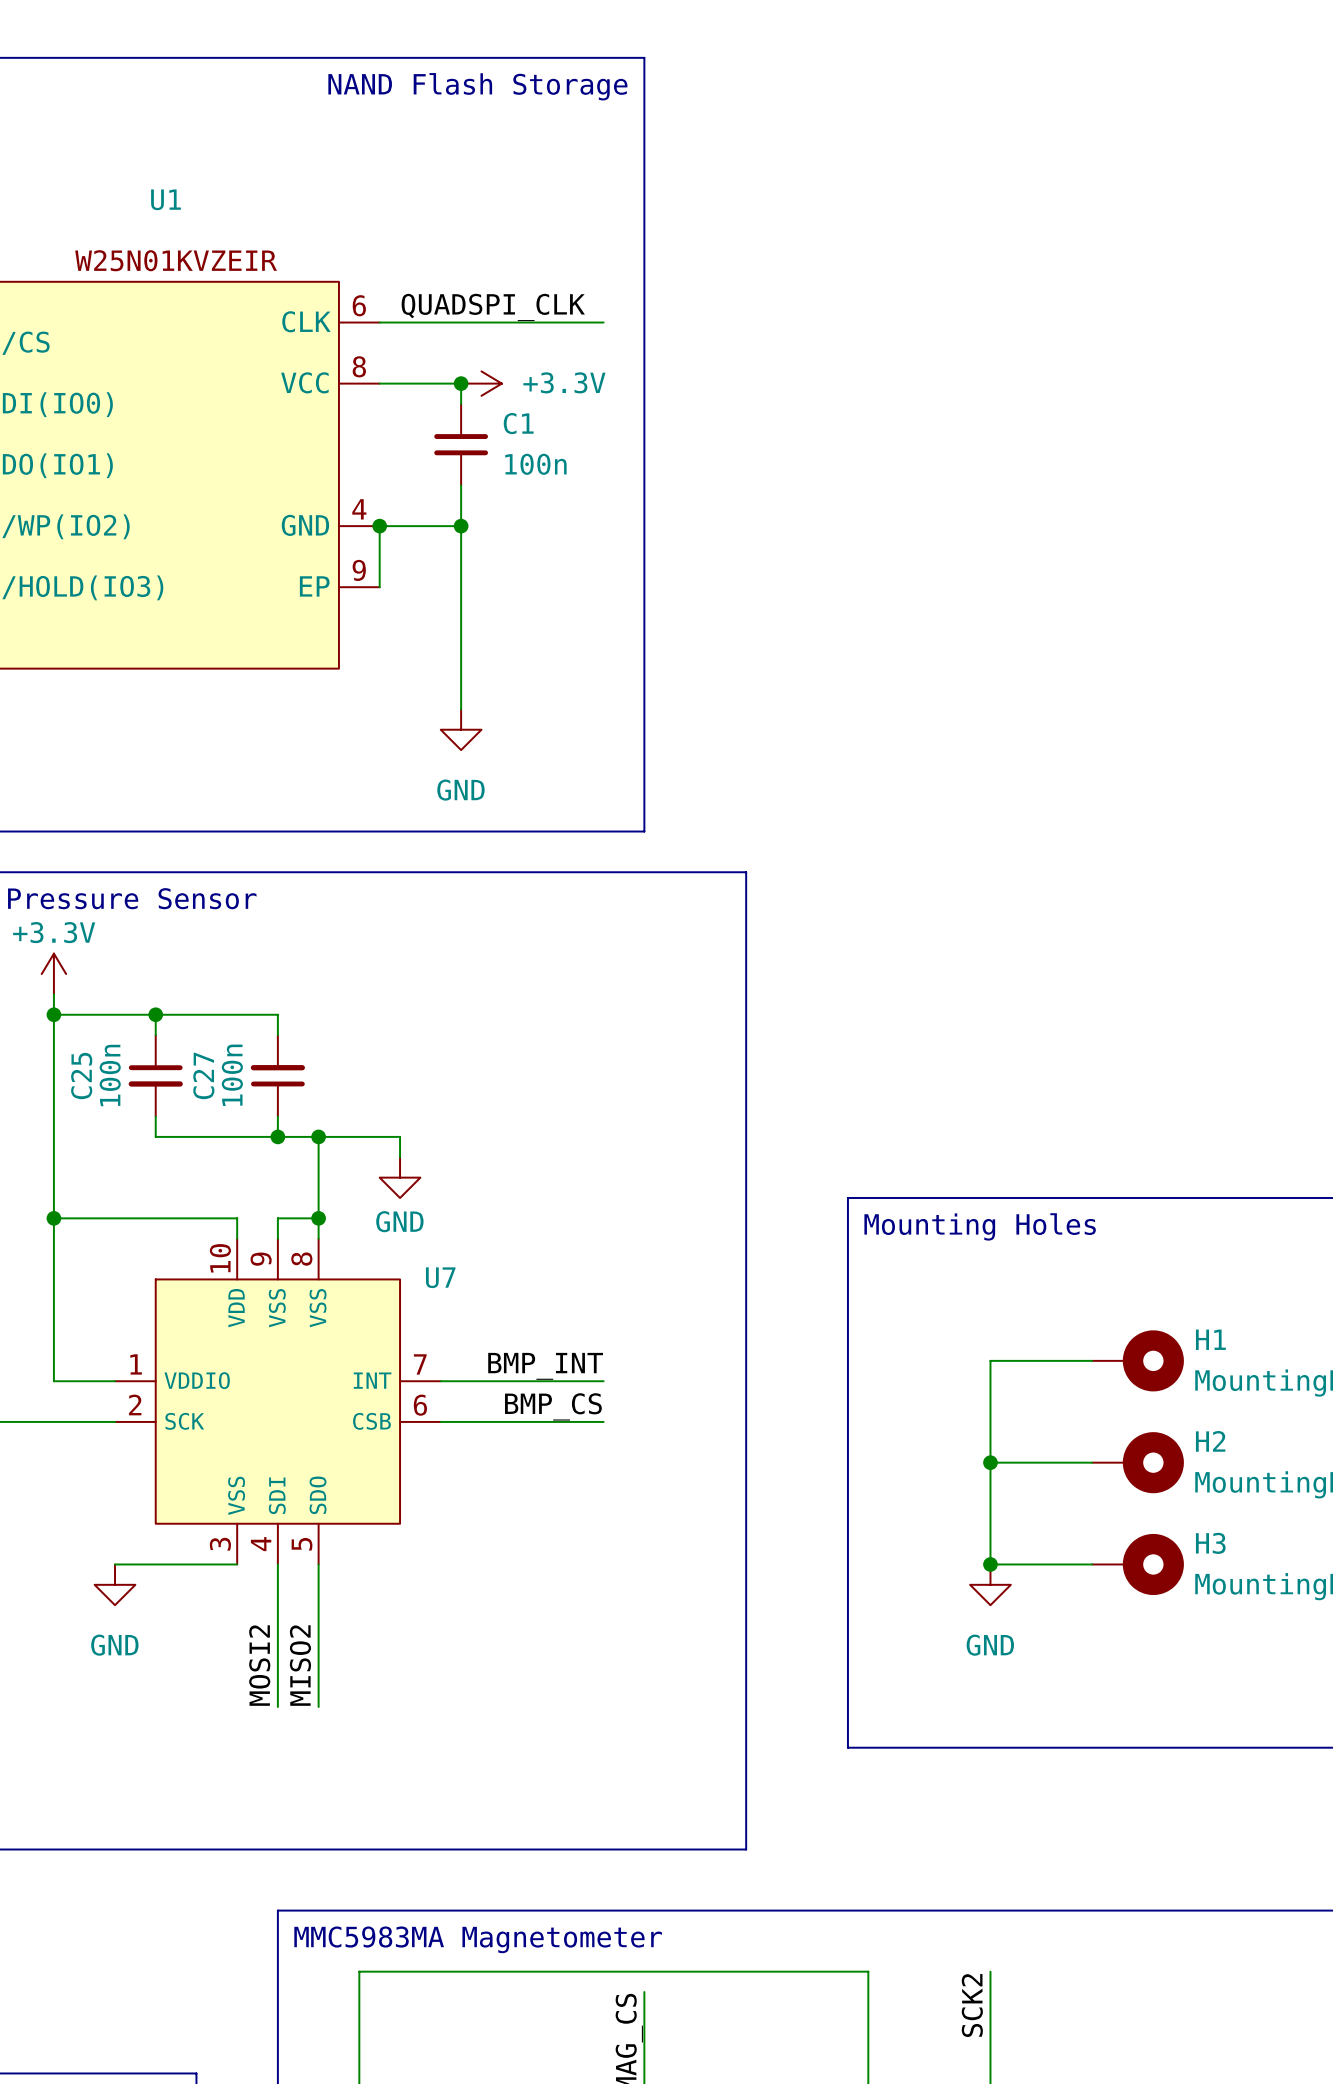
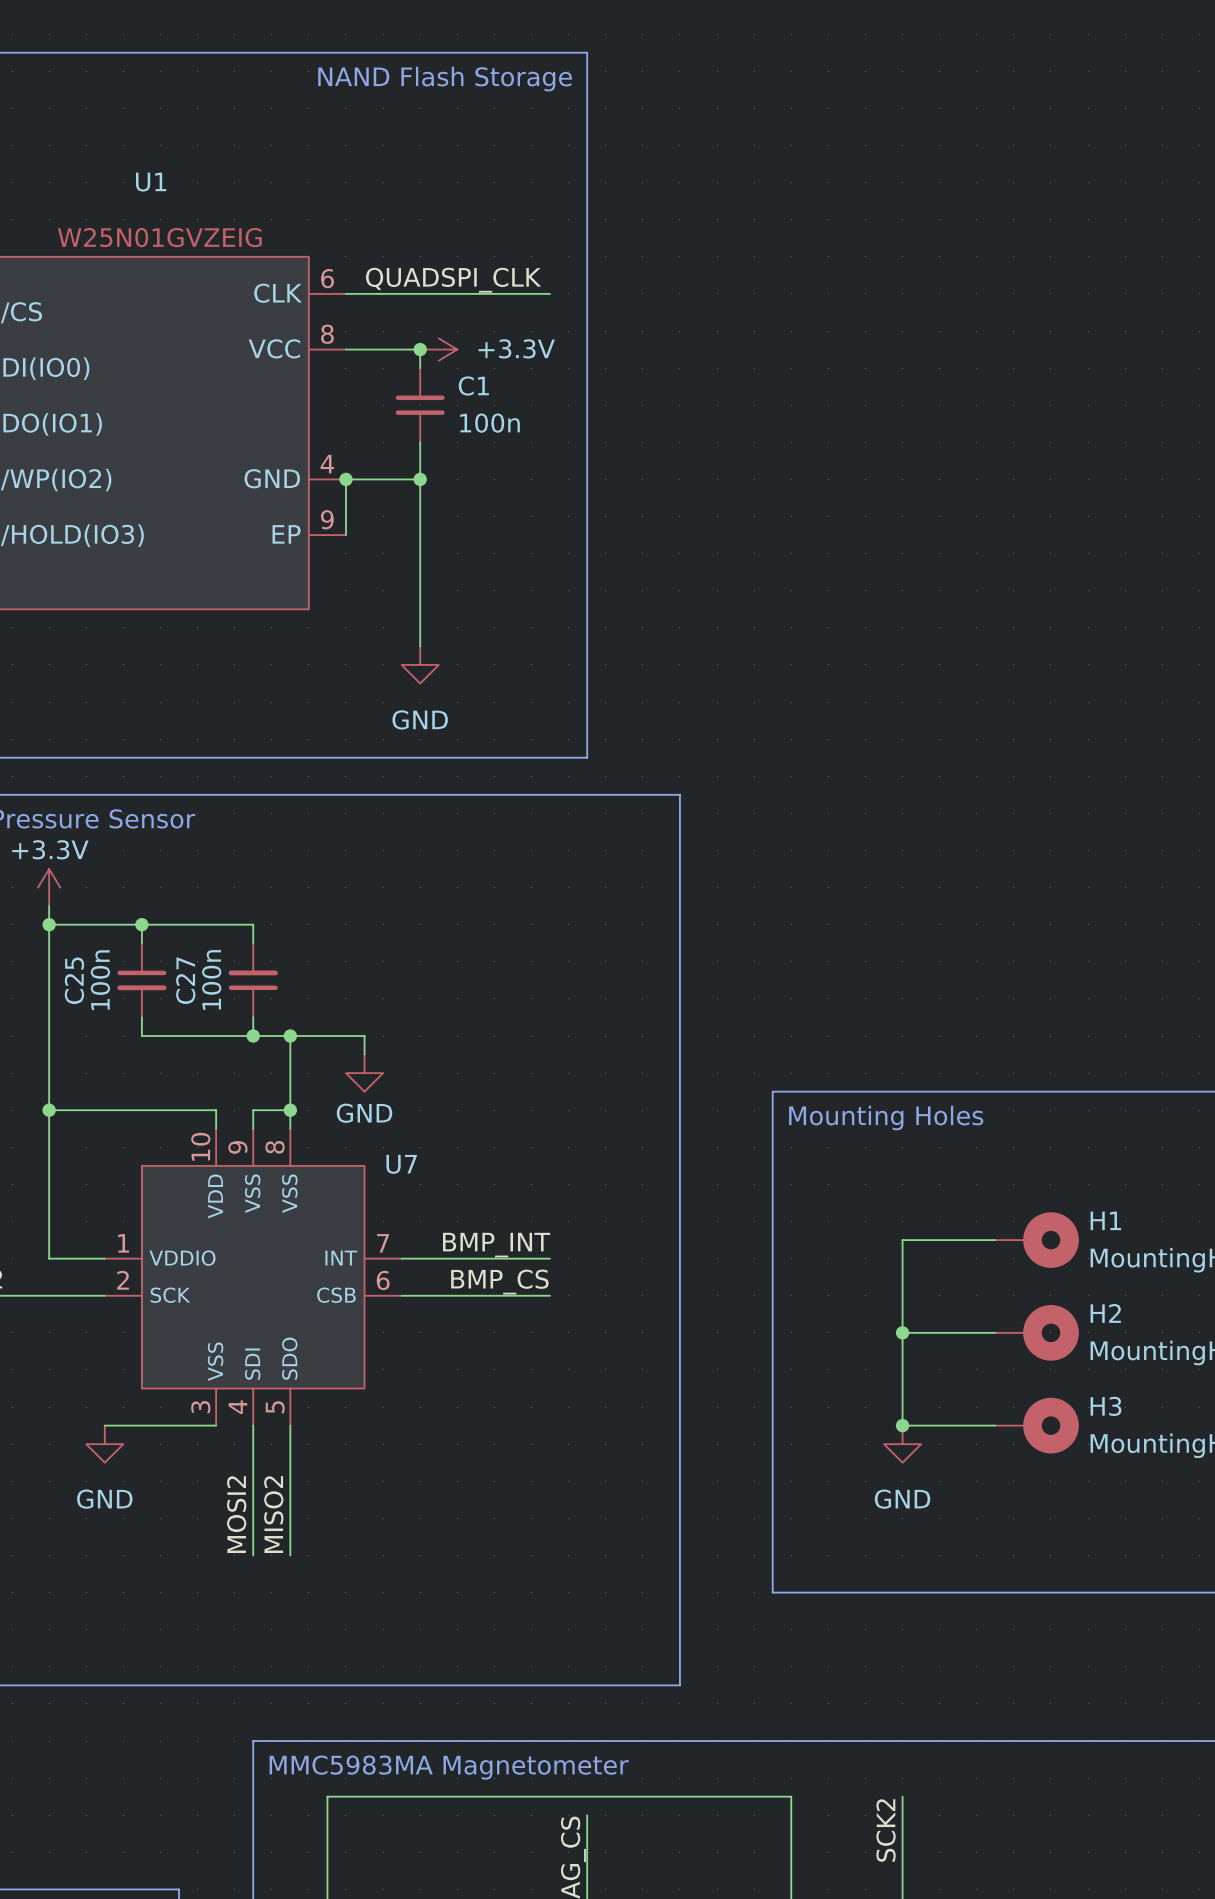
U1 text: W25N01KVZEIR (176, 260) -> W25N01GVZEIG (159, 237)

